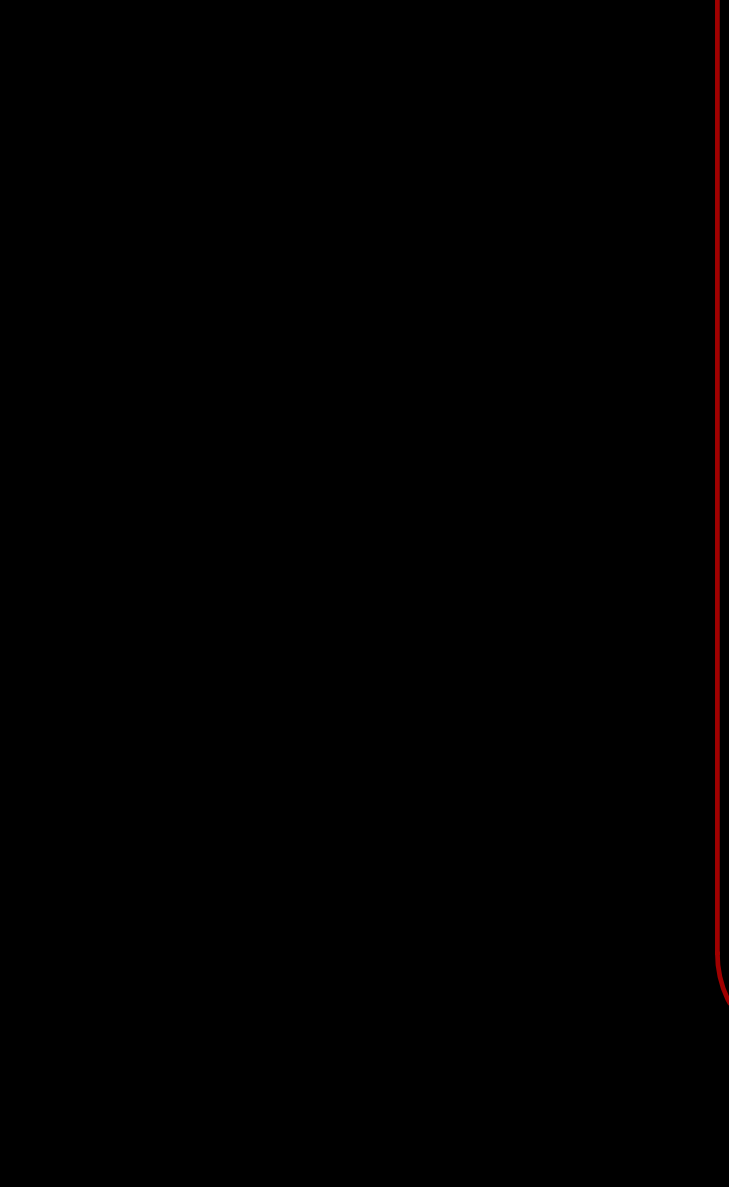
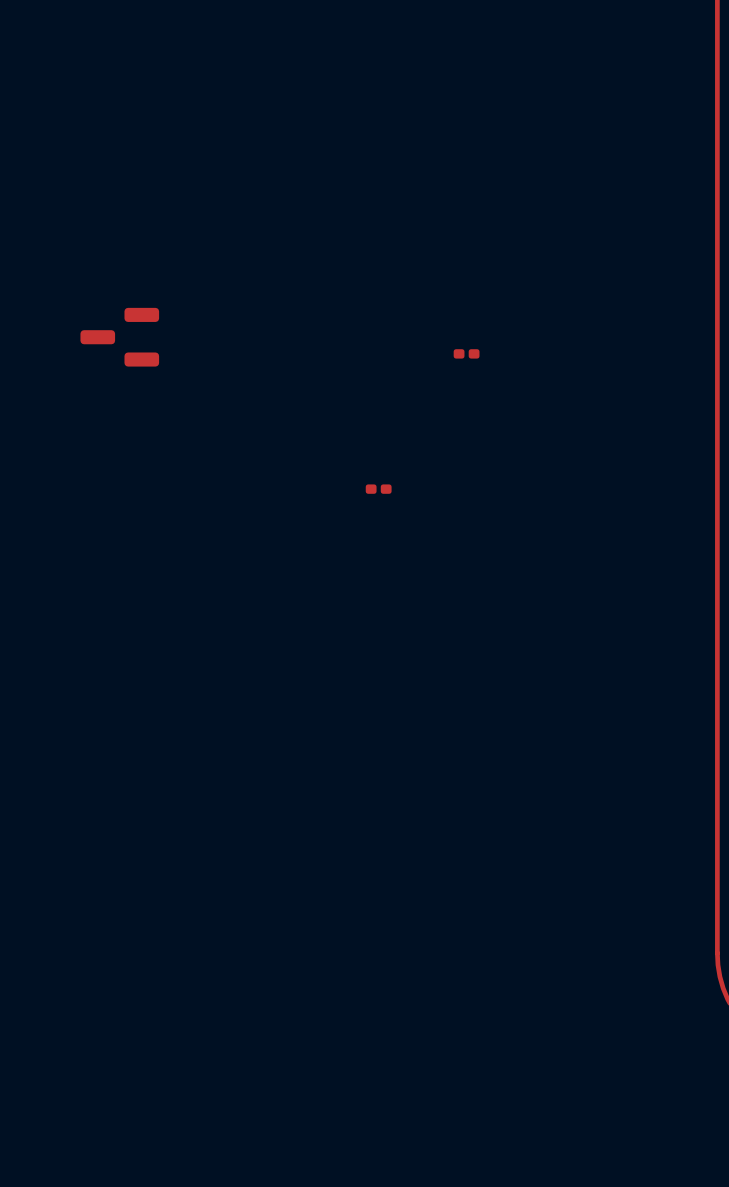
part: none -> (119, 337)
part: none -> (466, 353)
part: none -> (378, 489)

